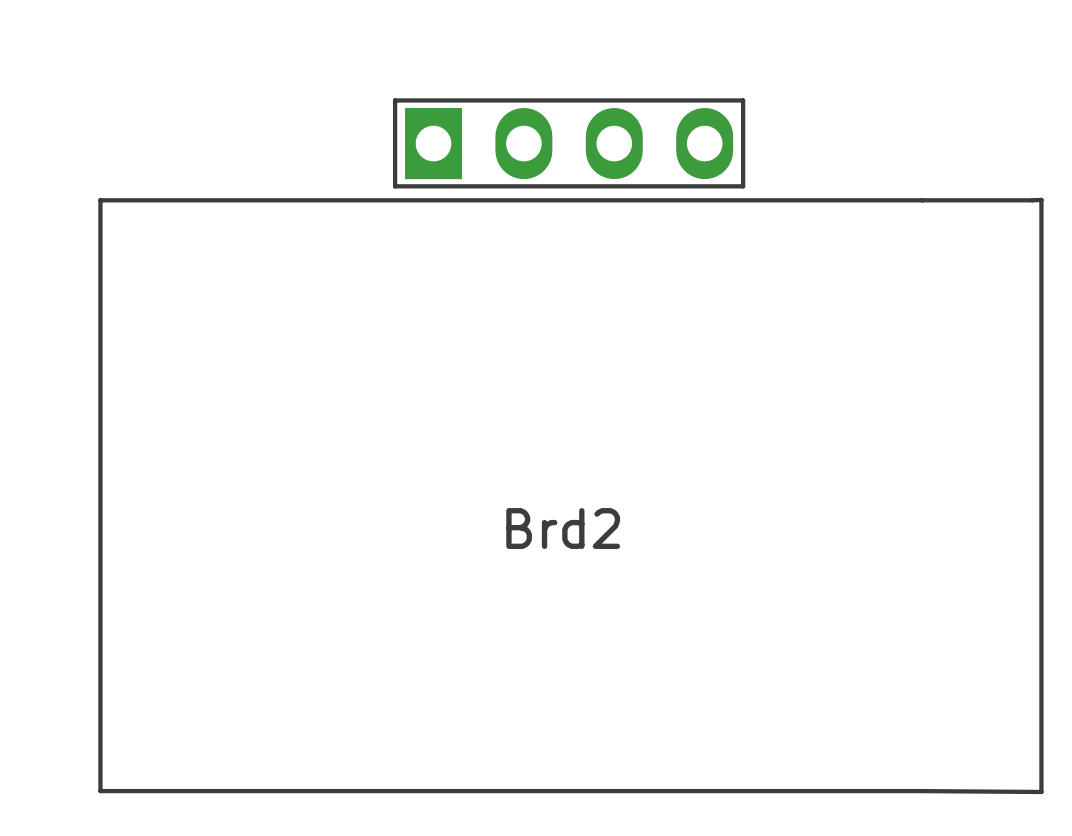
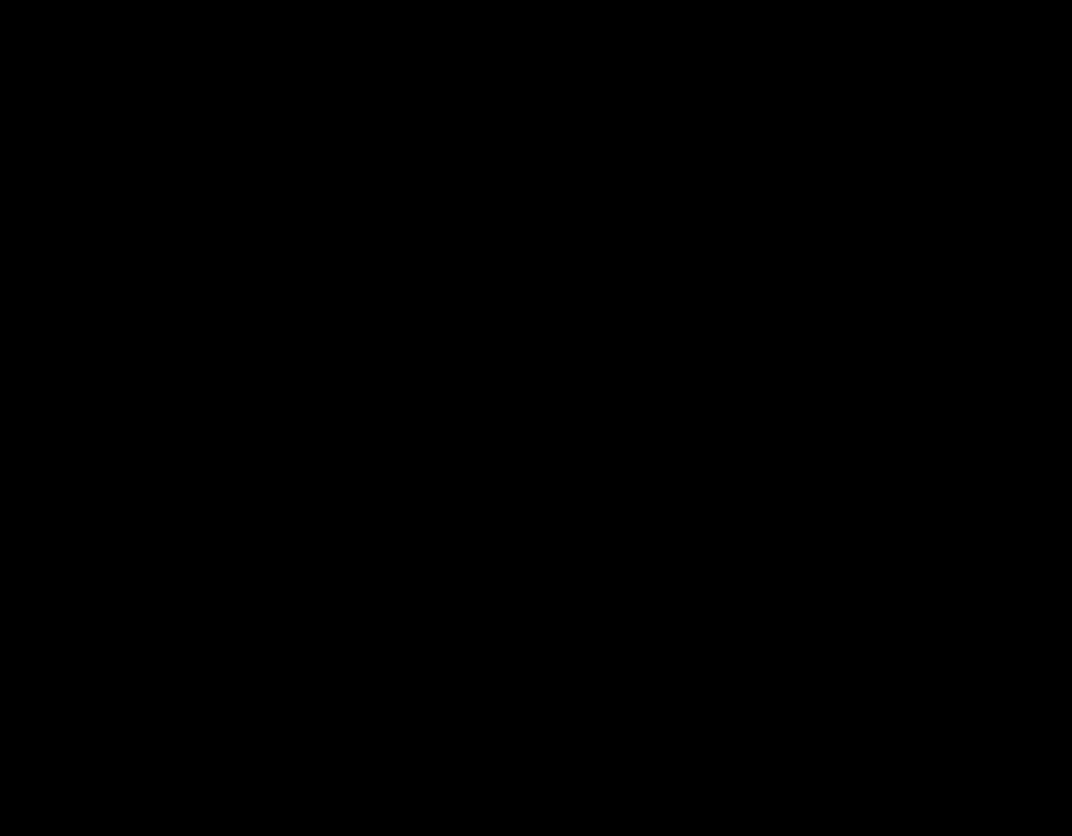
Brd2: (570, 446) -> none

